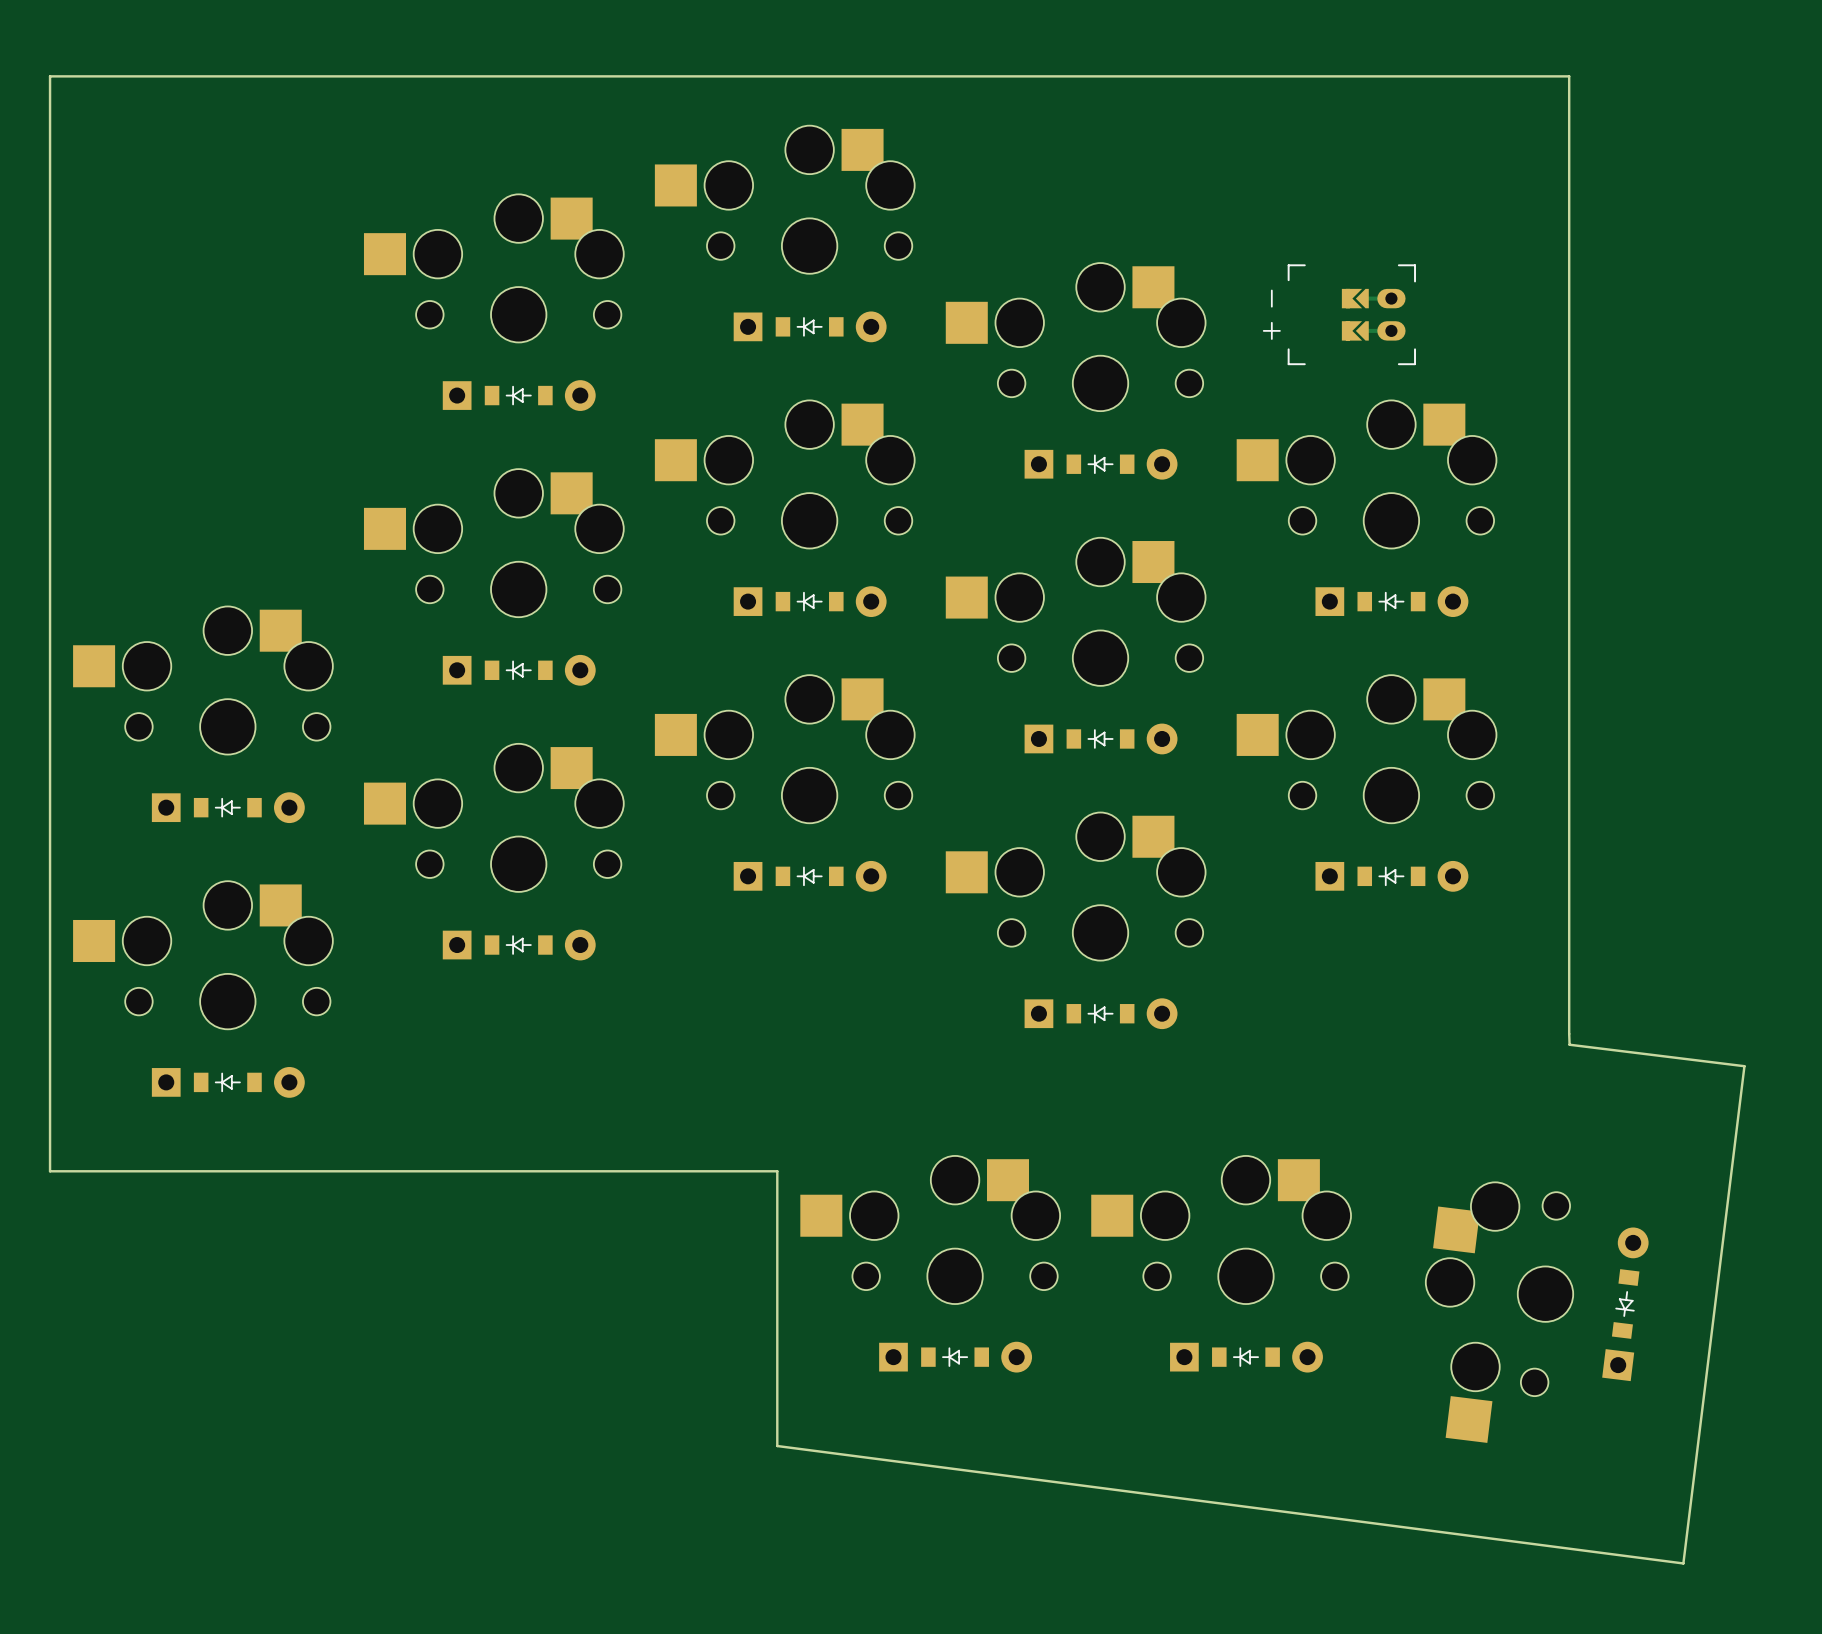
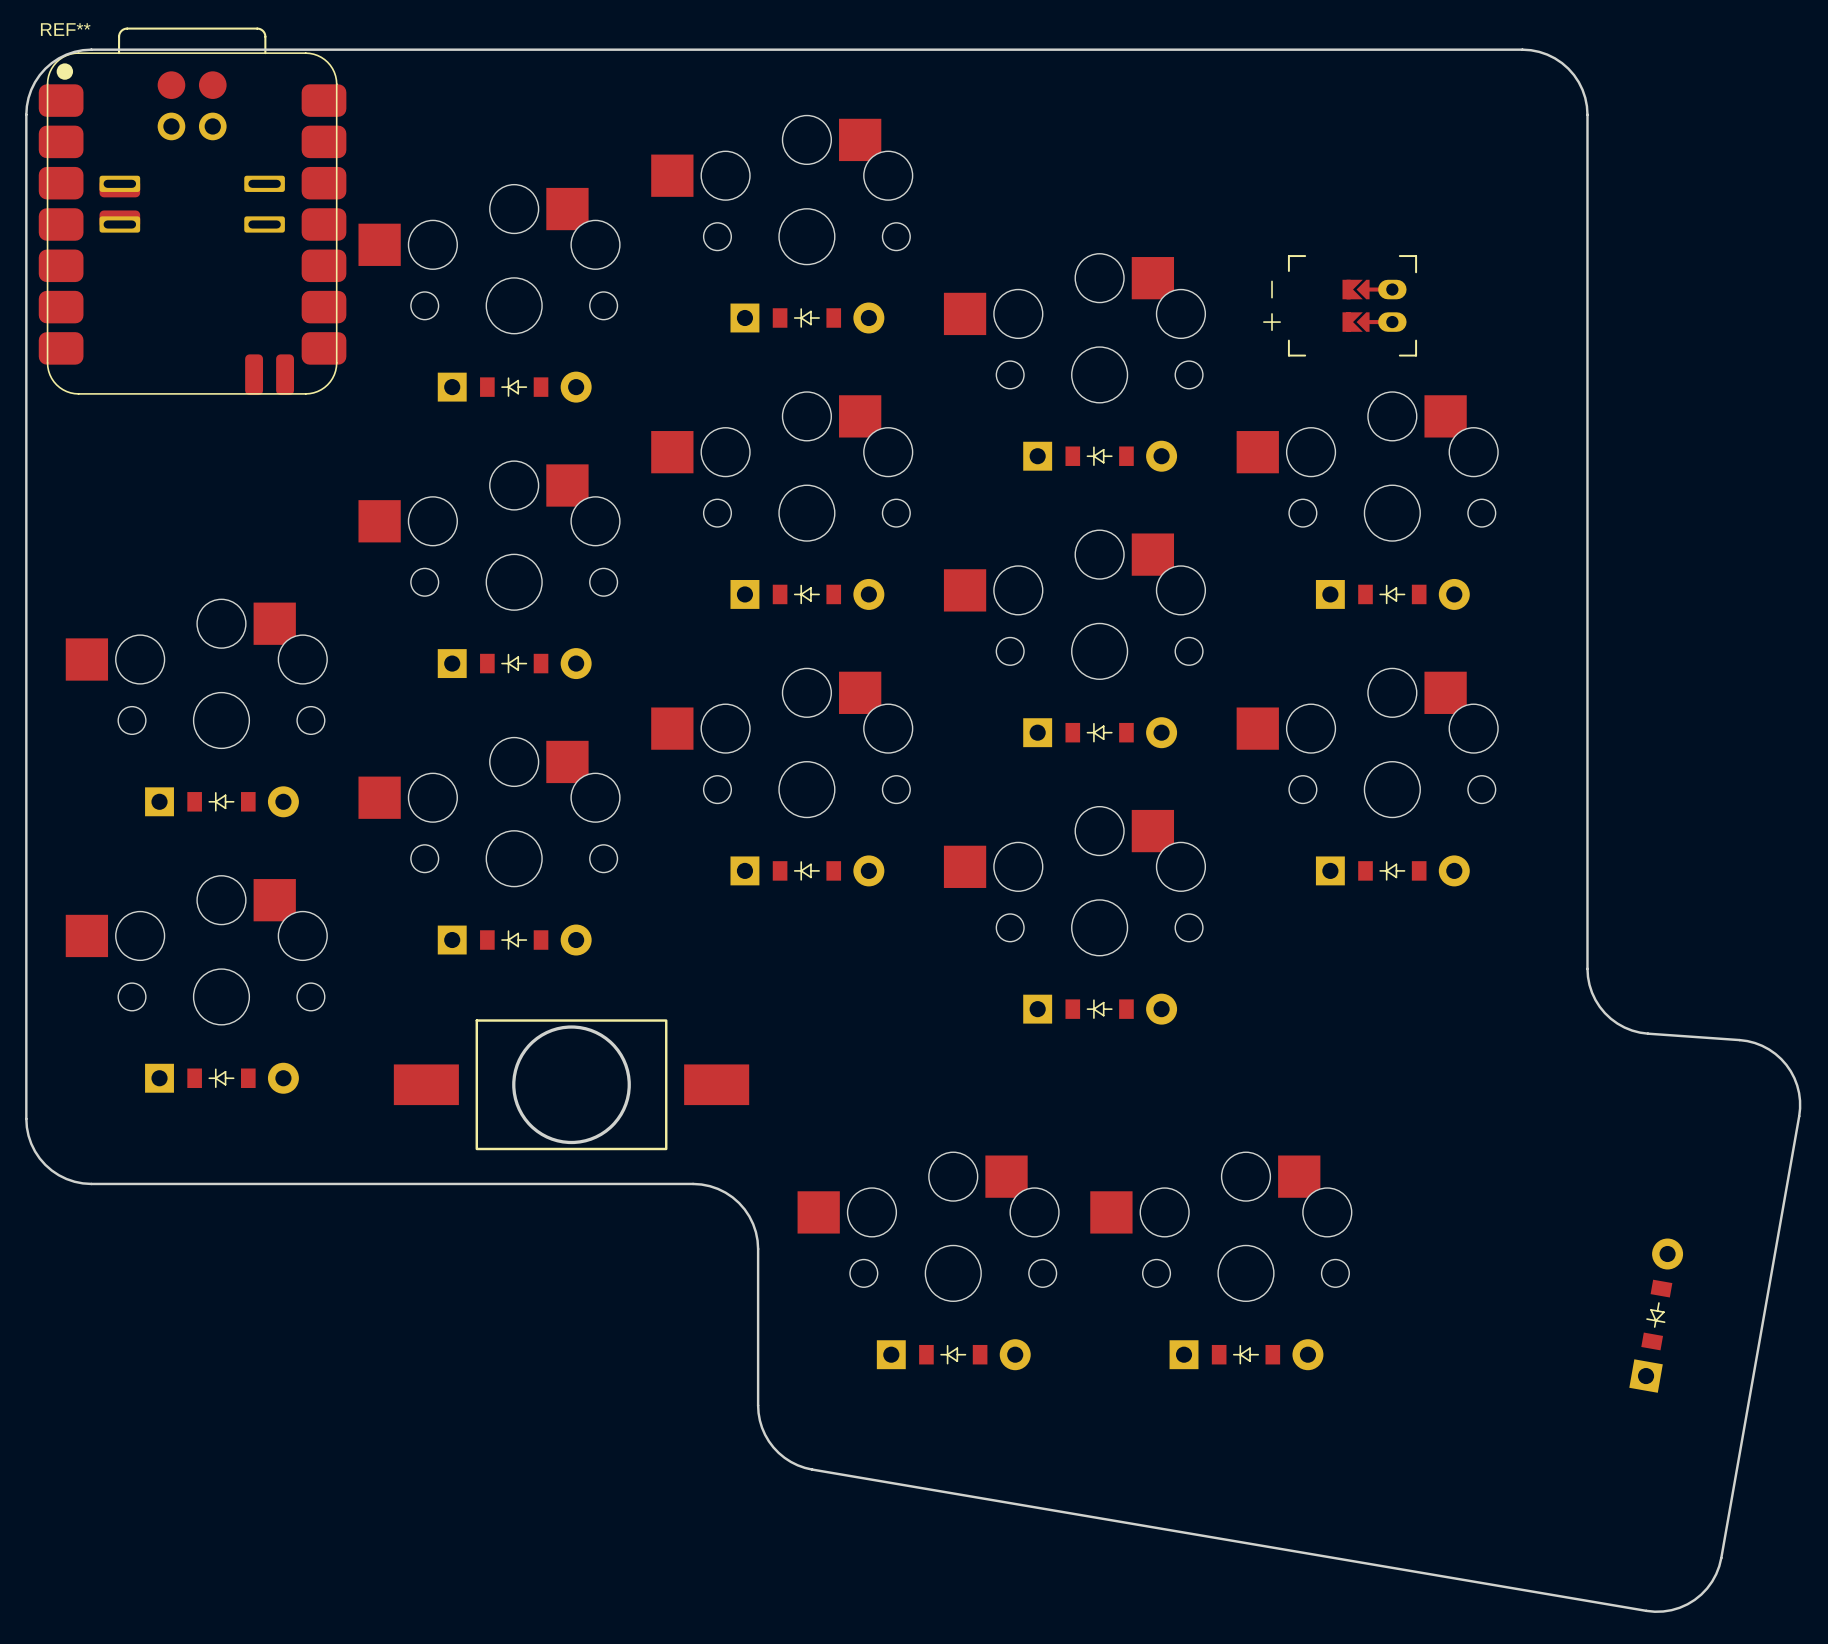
board edge: (50, 76) (1569, 76) (1569, 1044) (1744, 1066) (1683, 1563) (777, 1446) (777, 1171) (50, 1171) (50, 76) -> (91, 49) (66, 54) (45, 68) (31, 89) (26, 114) (26, 1118) (31, 1143) (45, 1164) (66, 1179) (91, 1183) (693, 1183) (709, 1186) (725, 1192) (739, 1203) (749, 1216) (755, 1232) (758, 1249) (758, 1405) (759, 1420) (765, 1434) (773, 1447) (784, 1457) (797, 1465) (812, 1469) (1646, 1610) (1671, 1610) (1687, 1604) (1701, 1594) (1716, 1574) (1721, 1558) (1799, 1116) (1800, 1100) (1797, 1085) (1790, 1071) (1781, 1059) (1769, 1049) (1747, 1041) (1648, 1033) (1632, 1030) (1617, 1023) (1604, 1013) (1595, 1000) (1589, 984) (1587, 968) (1587, 114) (1582, 89) (1568, 68) (1547, 54) (1522, 49) (91, 49)
REF**: none -> (192, 211)
part: none -> (571, 1084)
part: (1625, 1304) -> none
part: (1499, 1312) -> none
part: none -> (1656, 1315)

